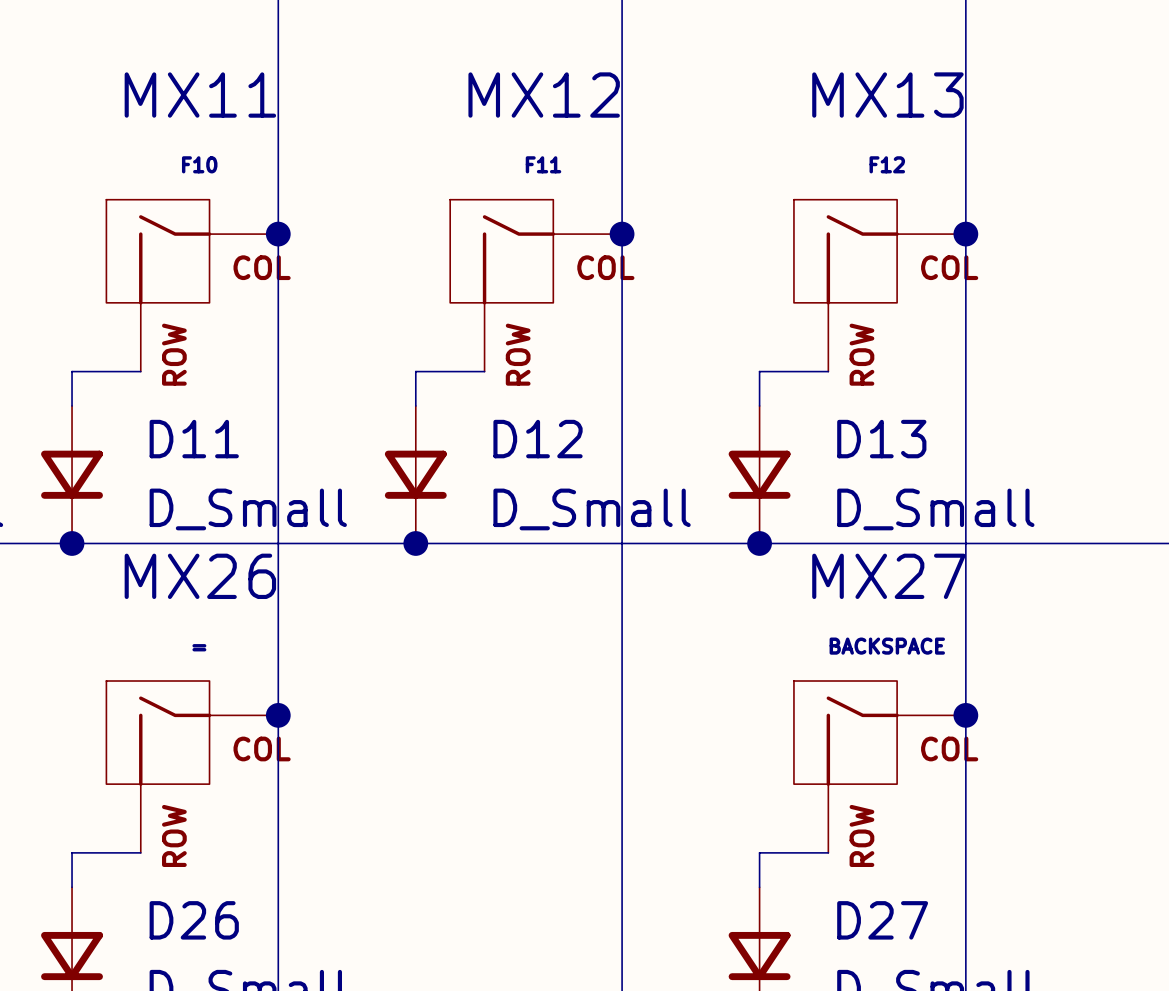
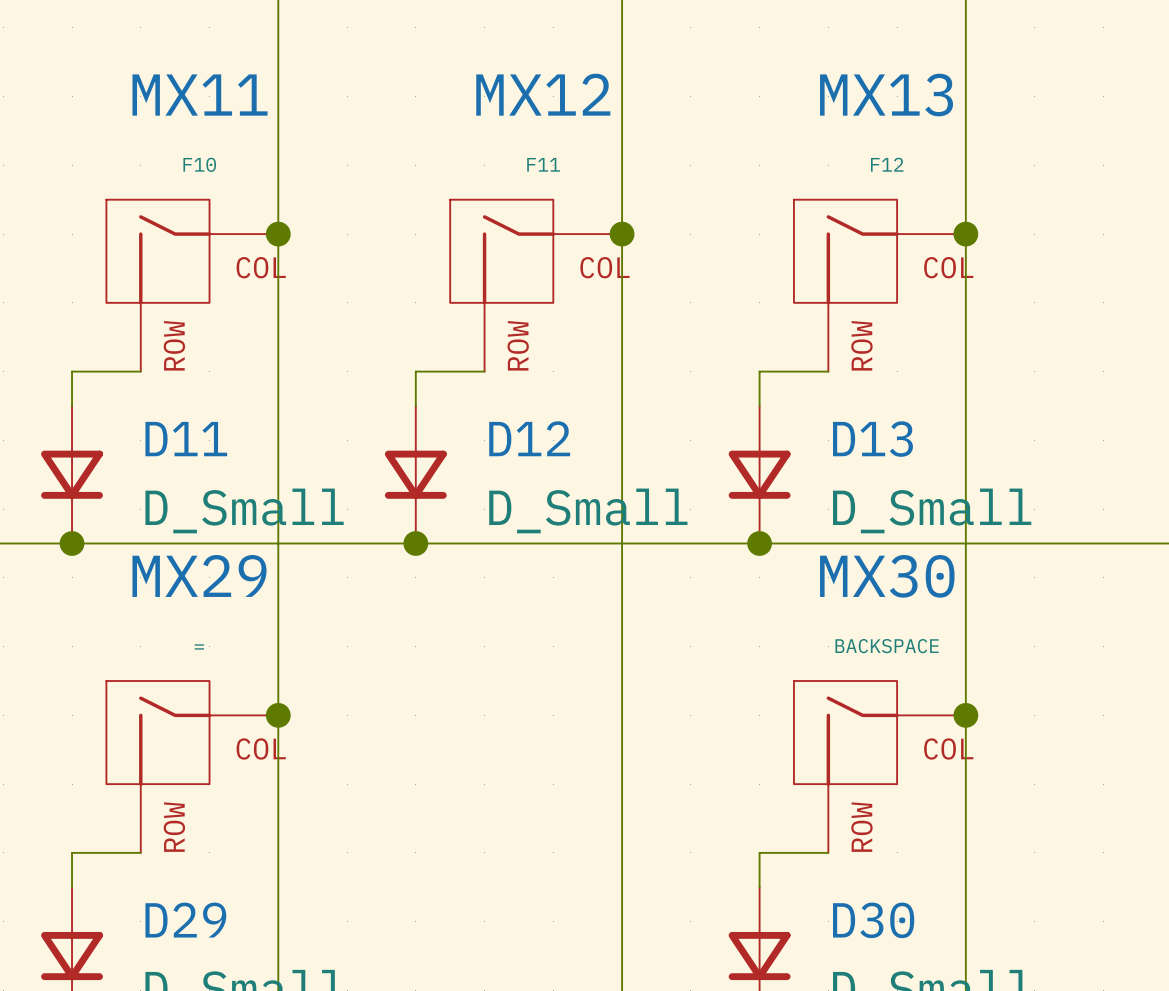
MX26 name: MX26 (200, 576) -> MX29 (199, 575)
MX27 name: MX27 (888, 576) -> MX30 (887, 576)
D26 name: D26 (194, 920) -> D29 (185, 920)
D27 name: D27 (882, 920) -> D30 (873, 920)

